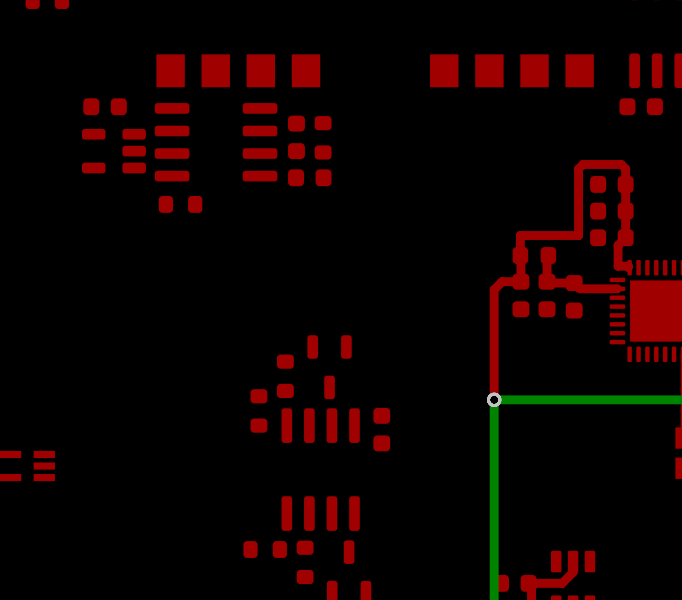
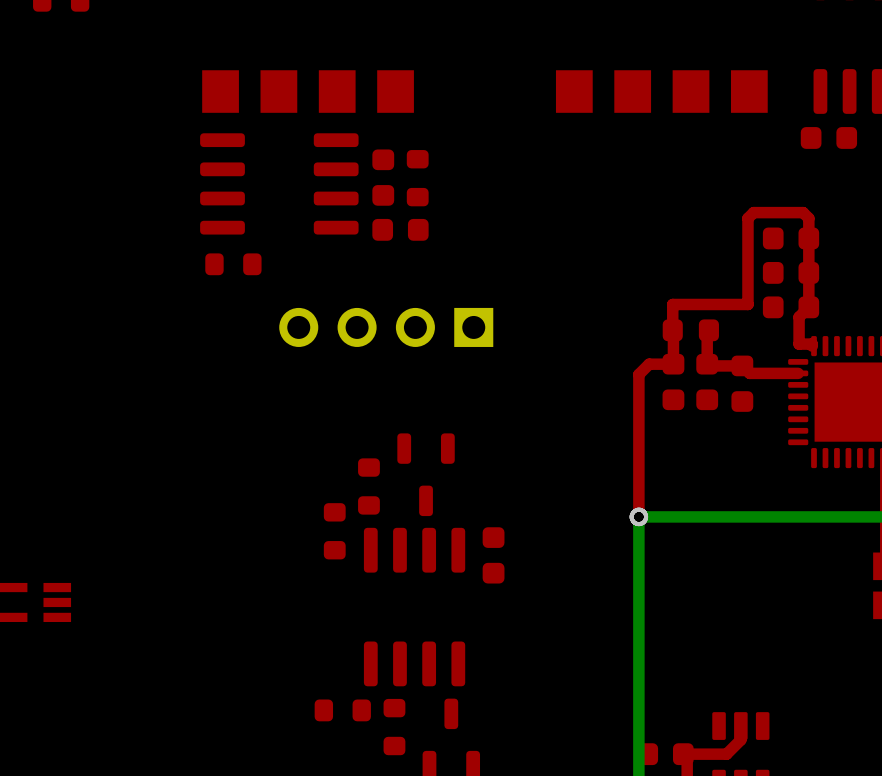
part: (105, 106) -> none
part: (113, 151) -> none
part: none -> (386, 327)

